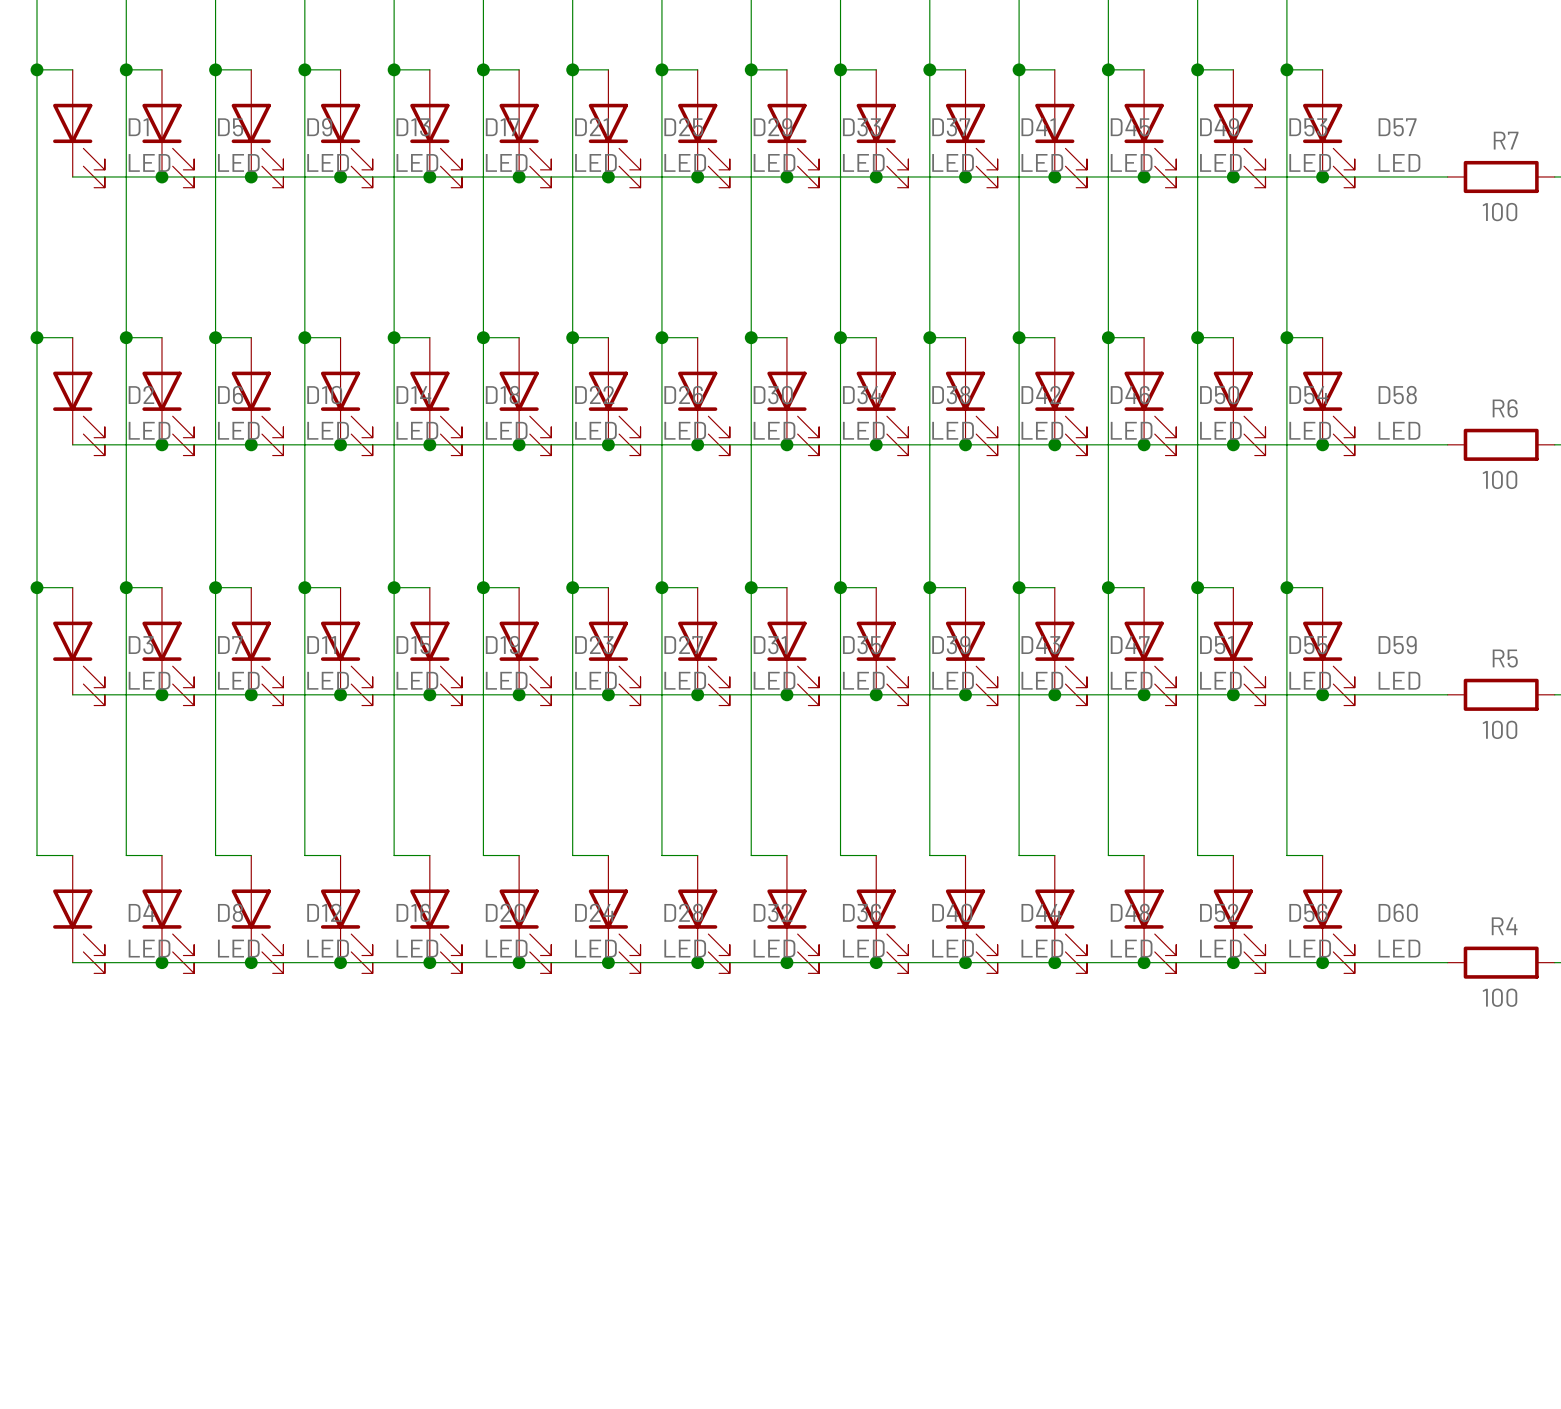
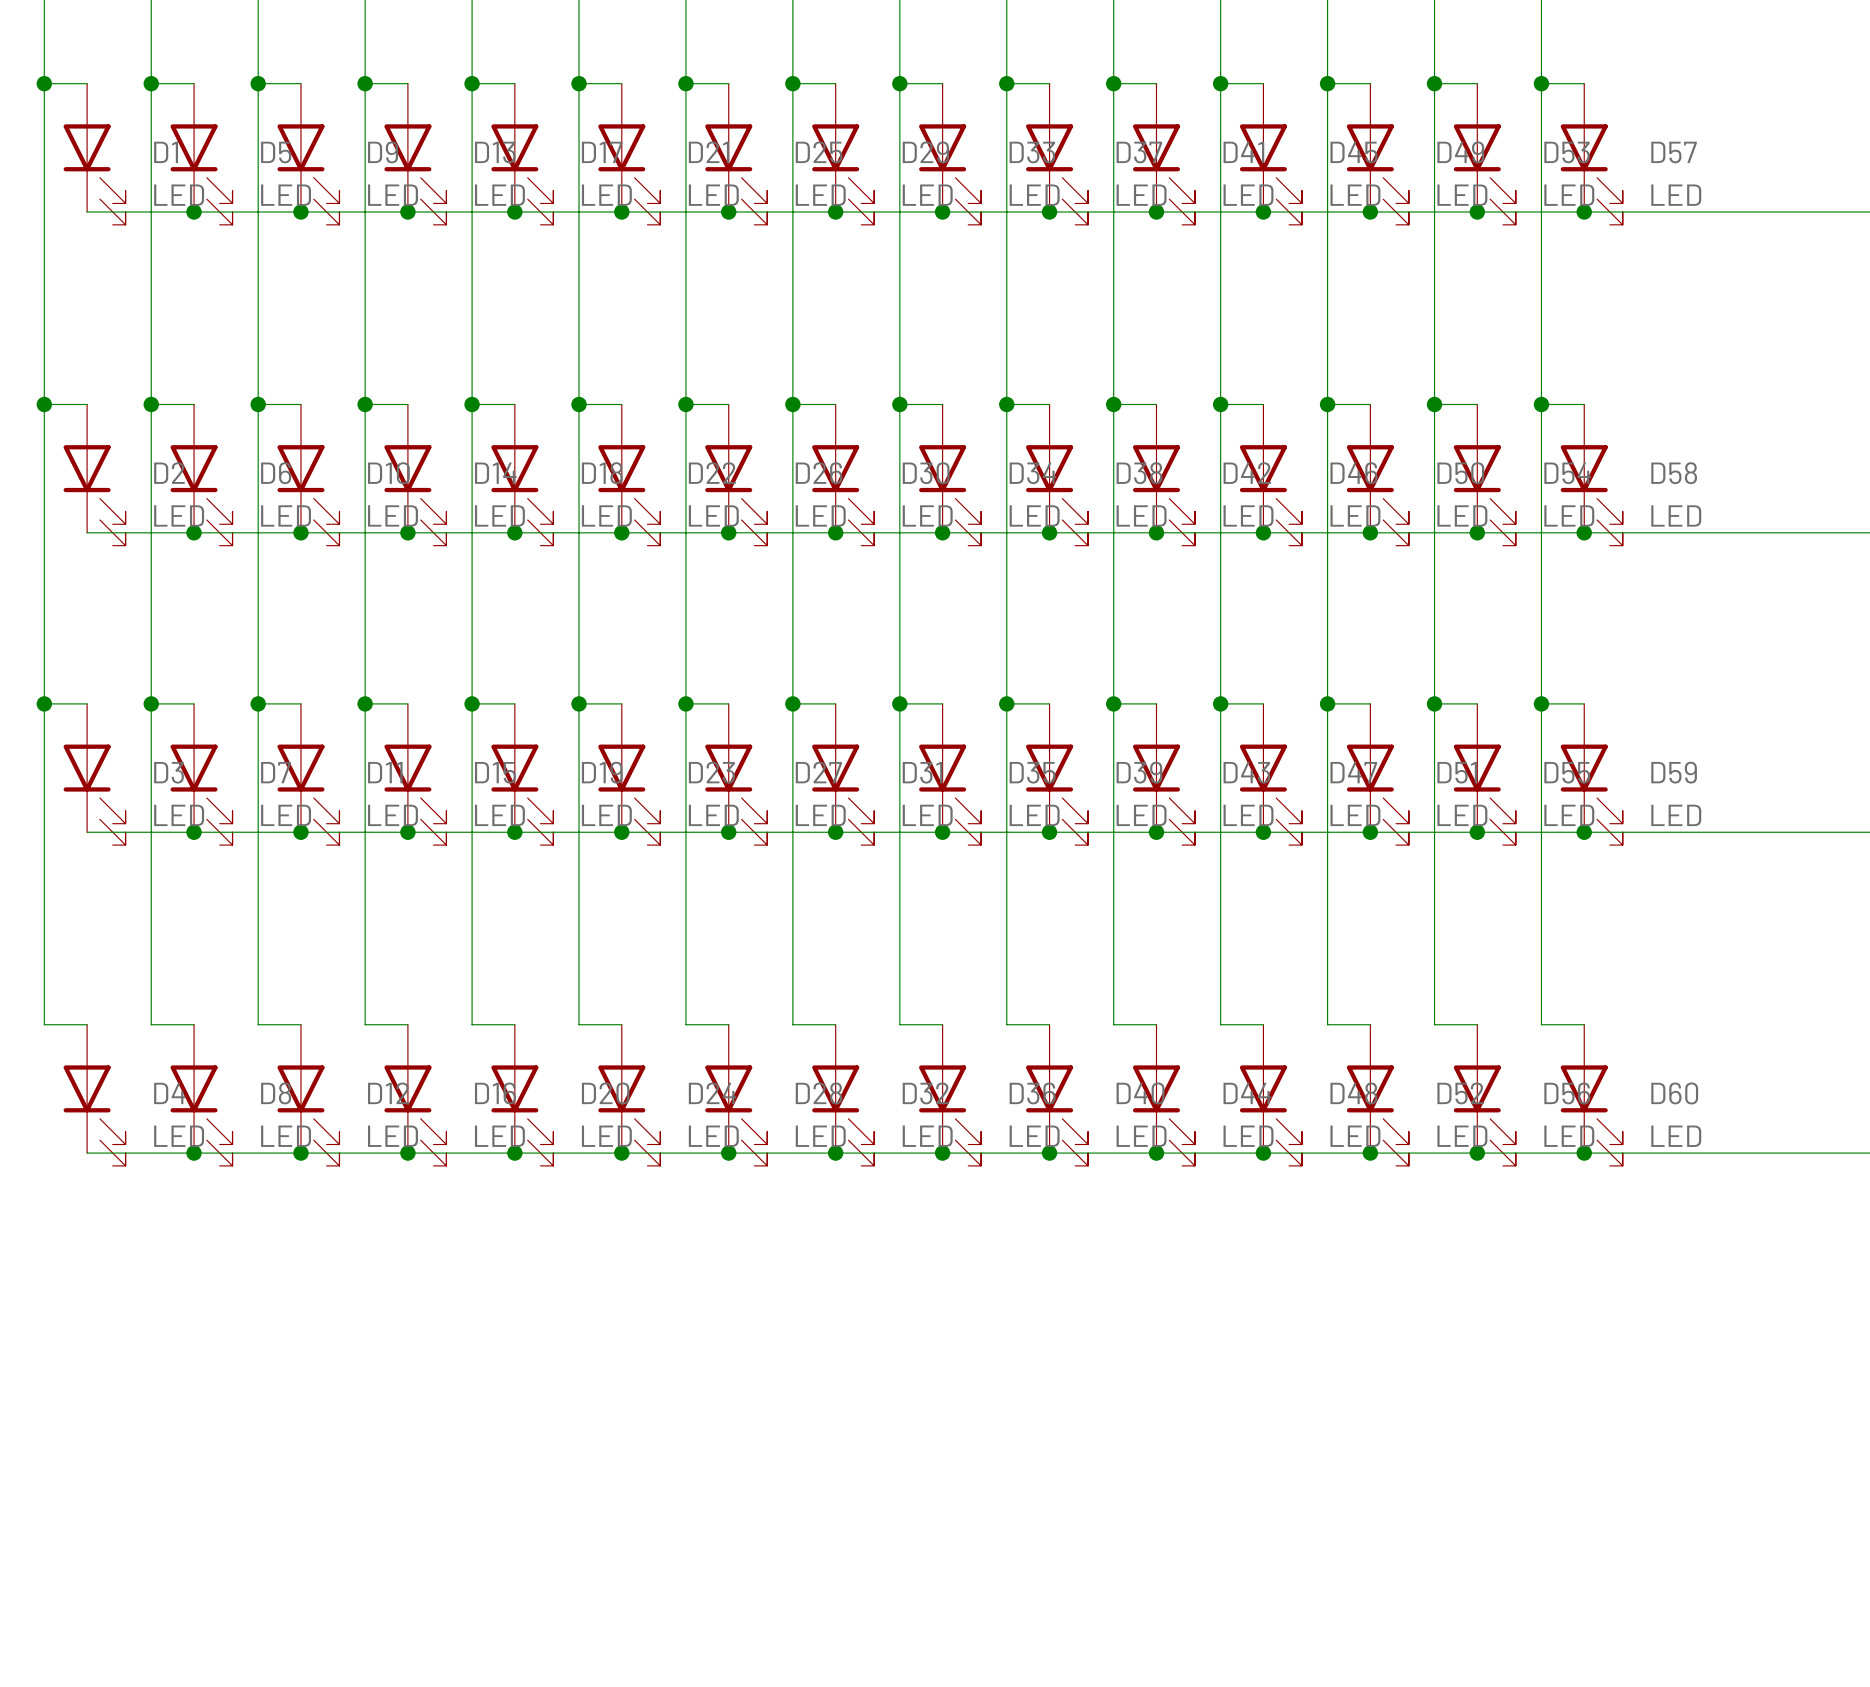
wire: none -> (1733, 212) (1862, 212)
R7: 100 (1501, 176) -> none
wire: none -> (1733, 532) (1862, 532)
R6: 100 (1501, 444) -> none
wire: none -> (1733, 832) (1862, 832)
R5: 100 (1501, 694) -> none
wire: none -> (1733, 1153) (1862, 1153)
R4: 100 (1501, 962) -> none

